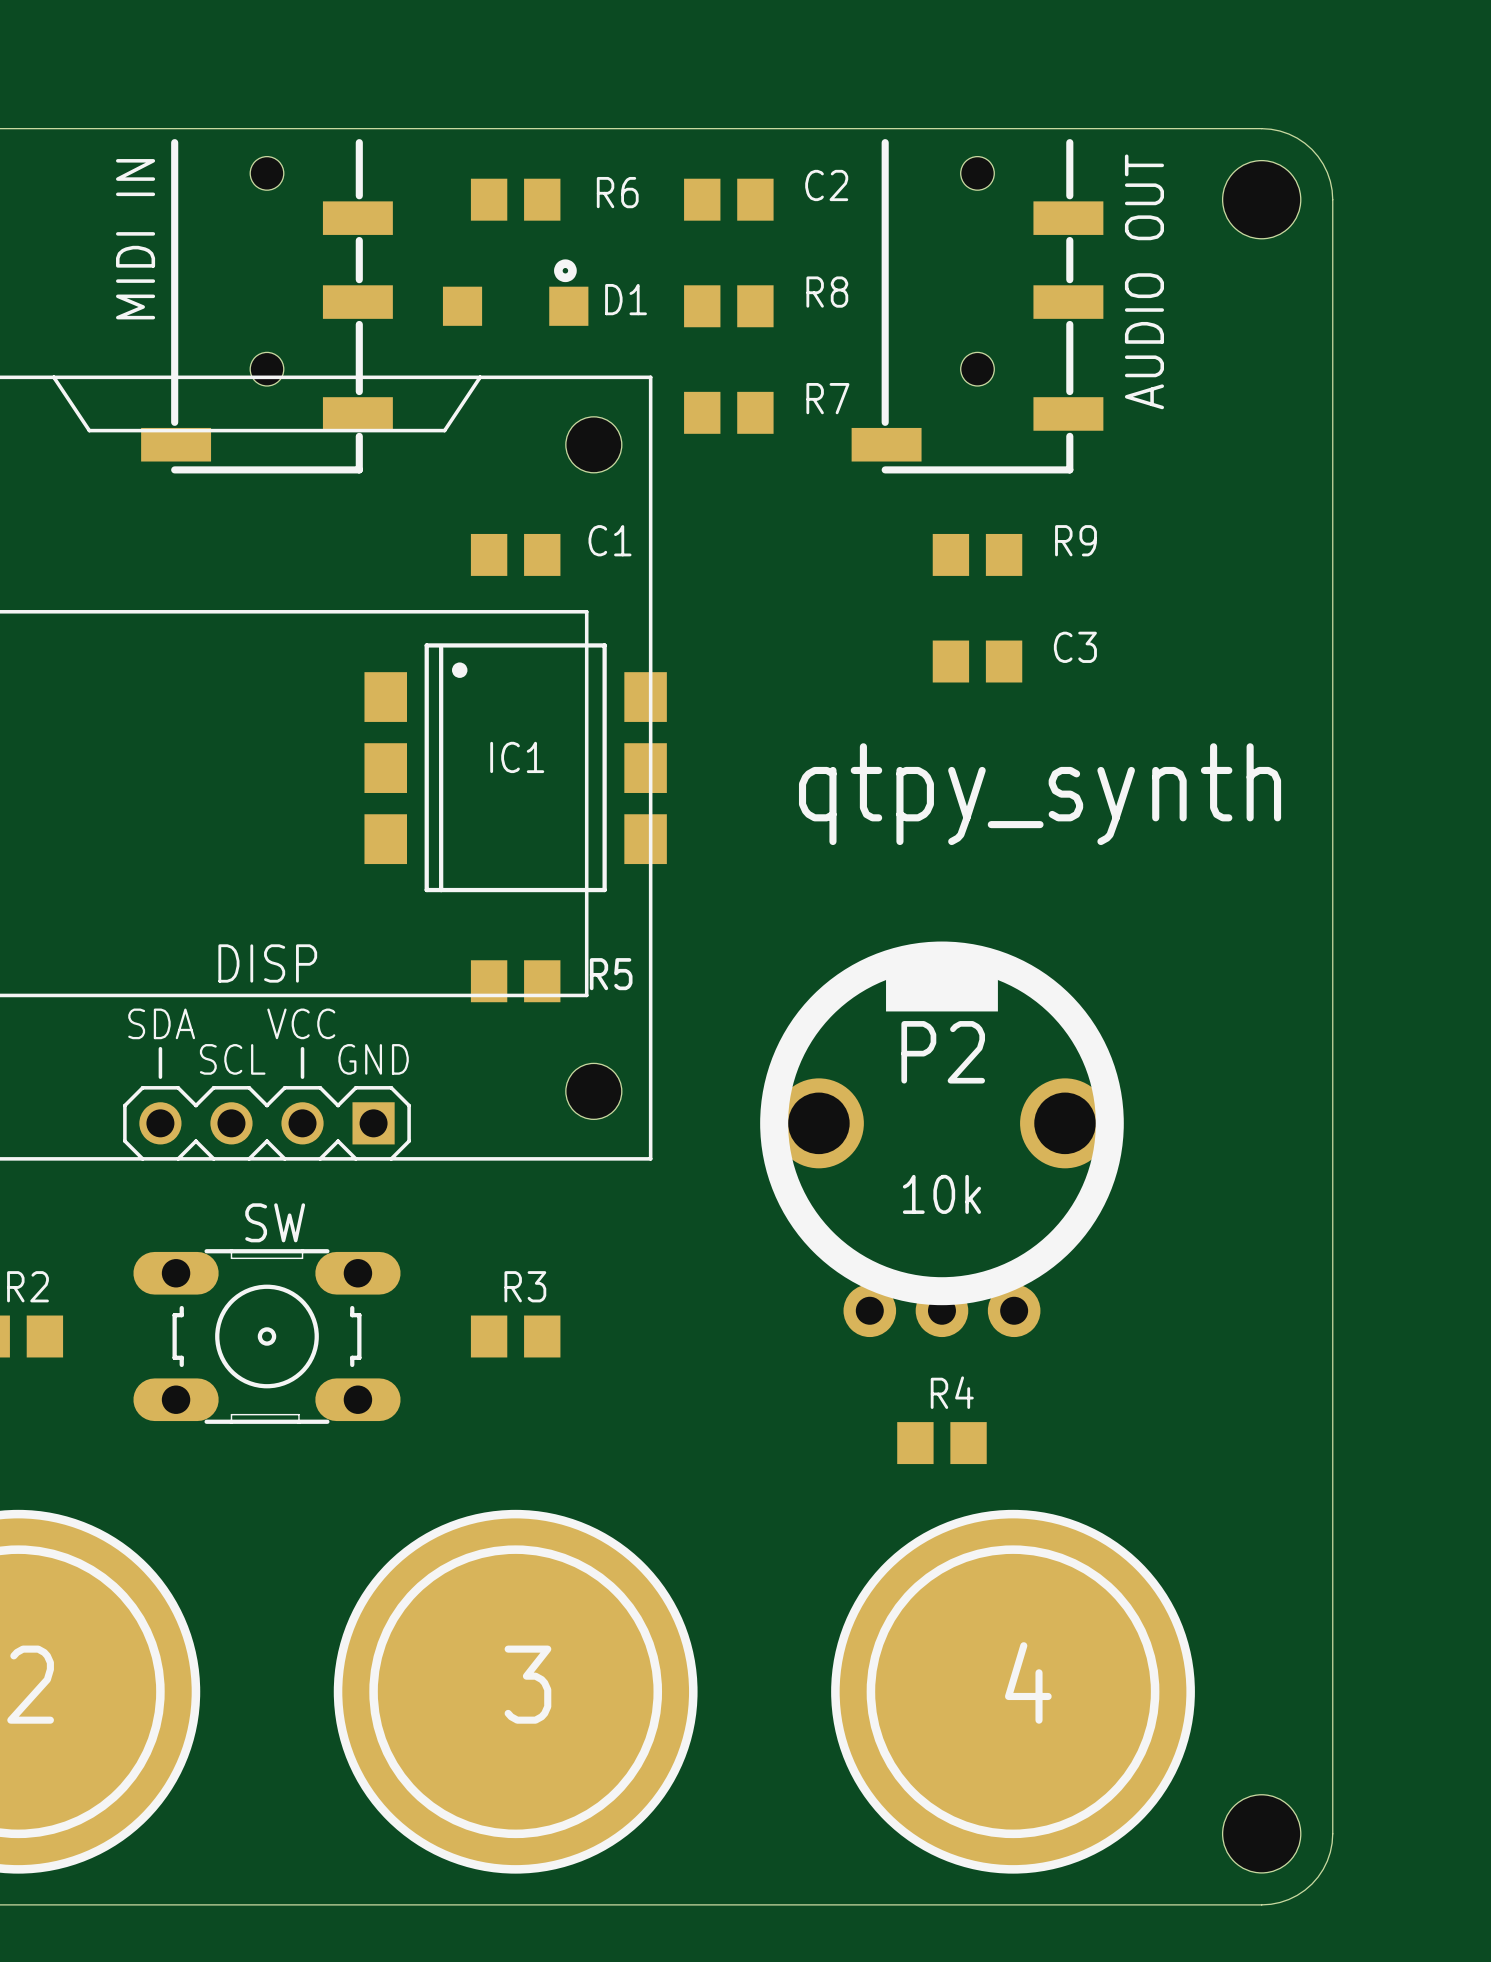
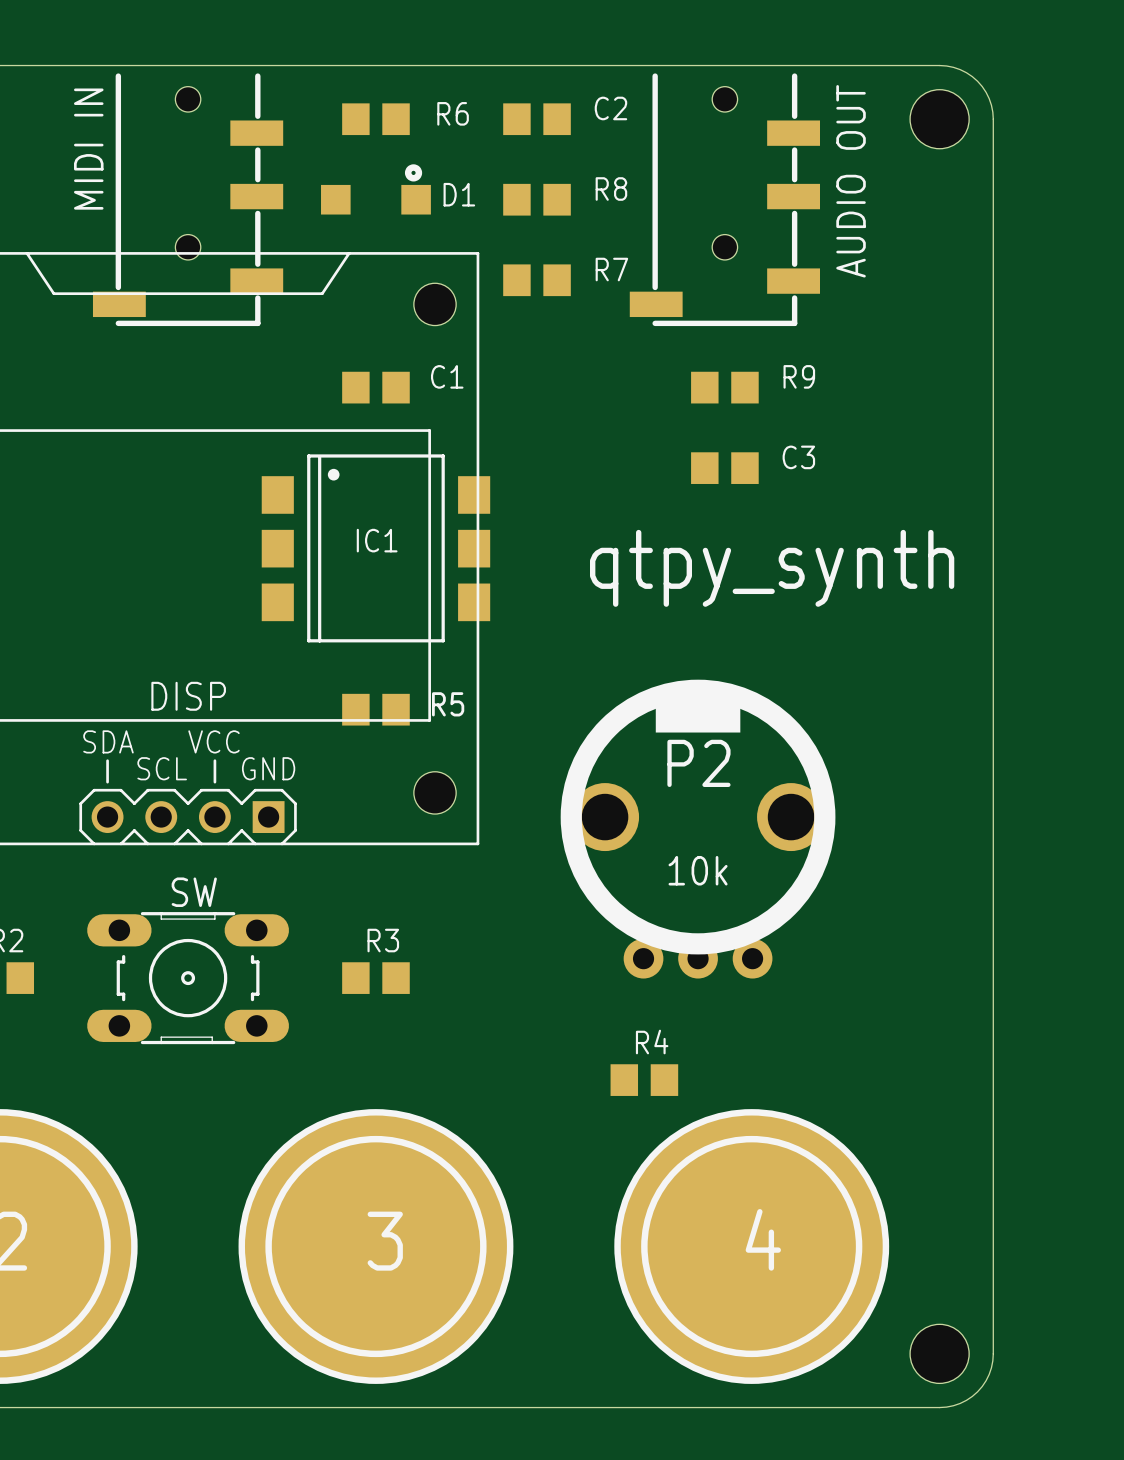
R4 position: (941, 1443) -> (644, 1080)

